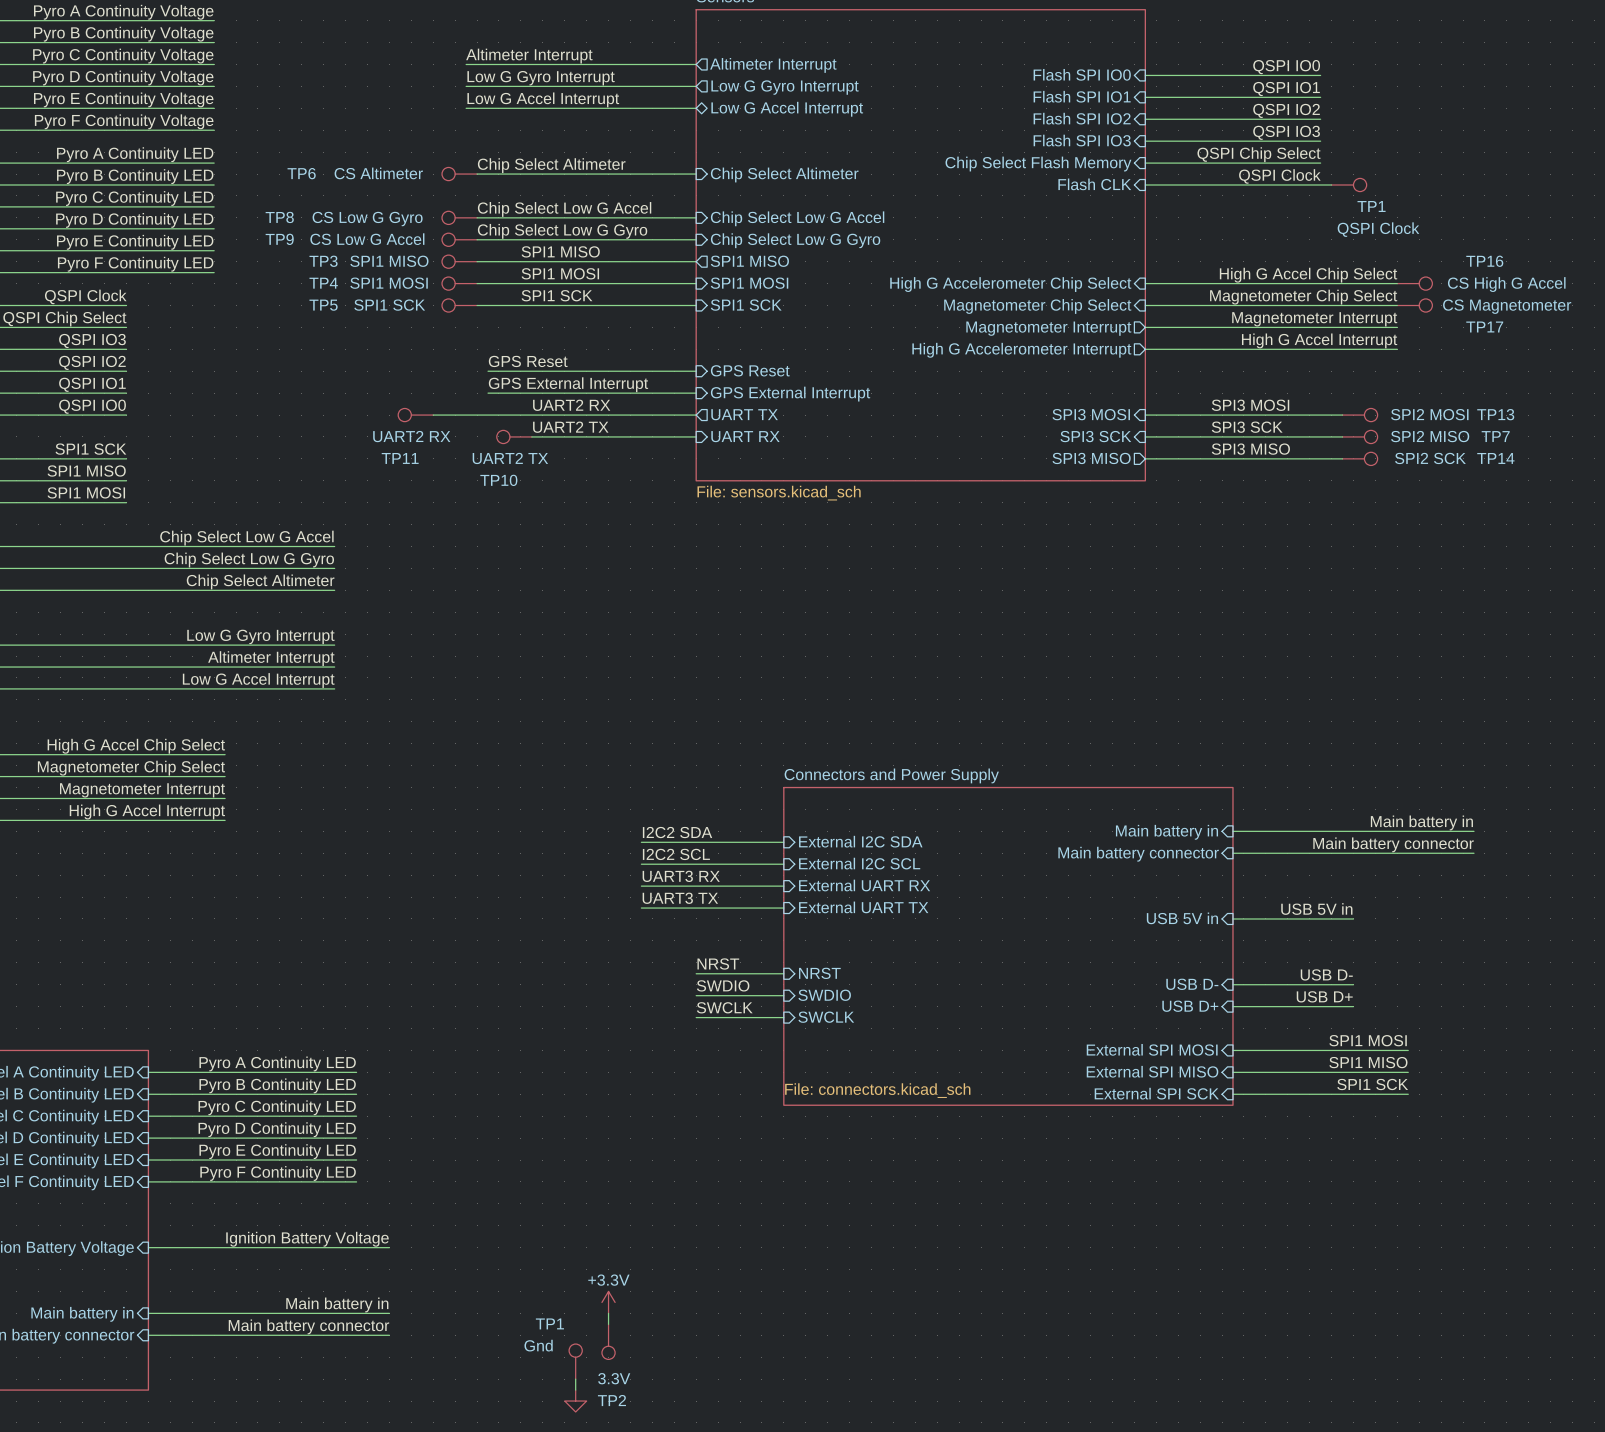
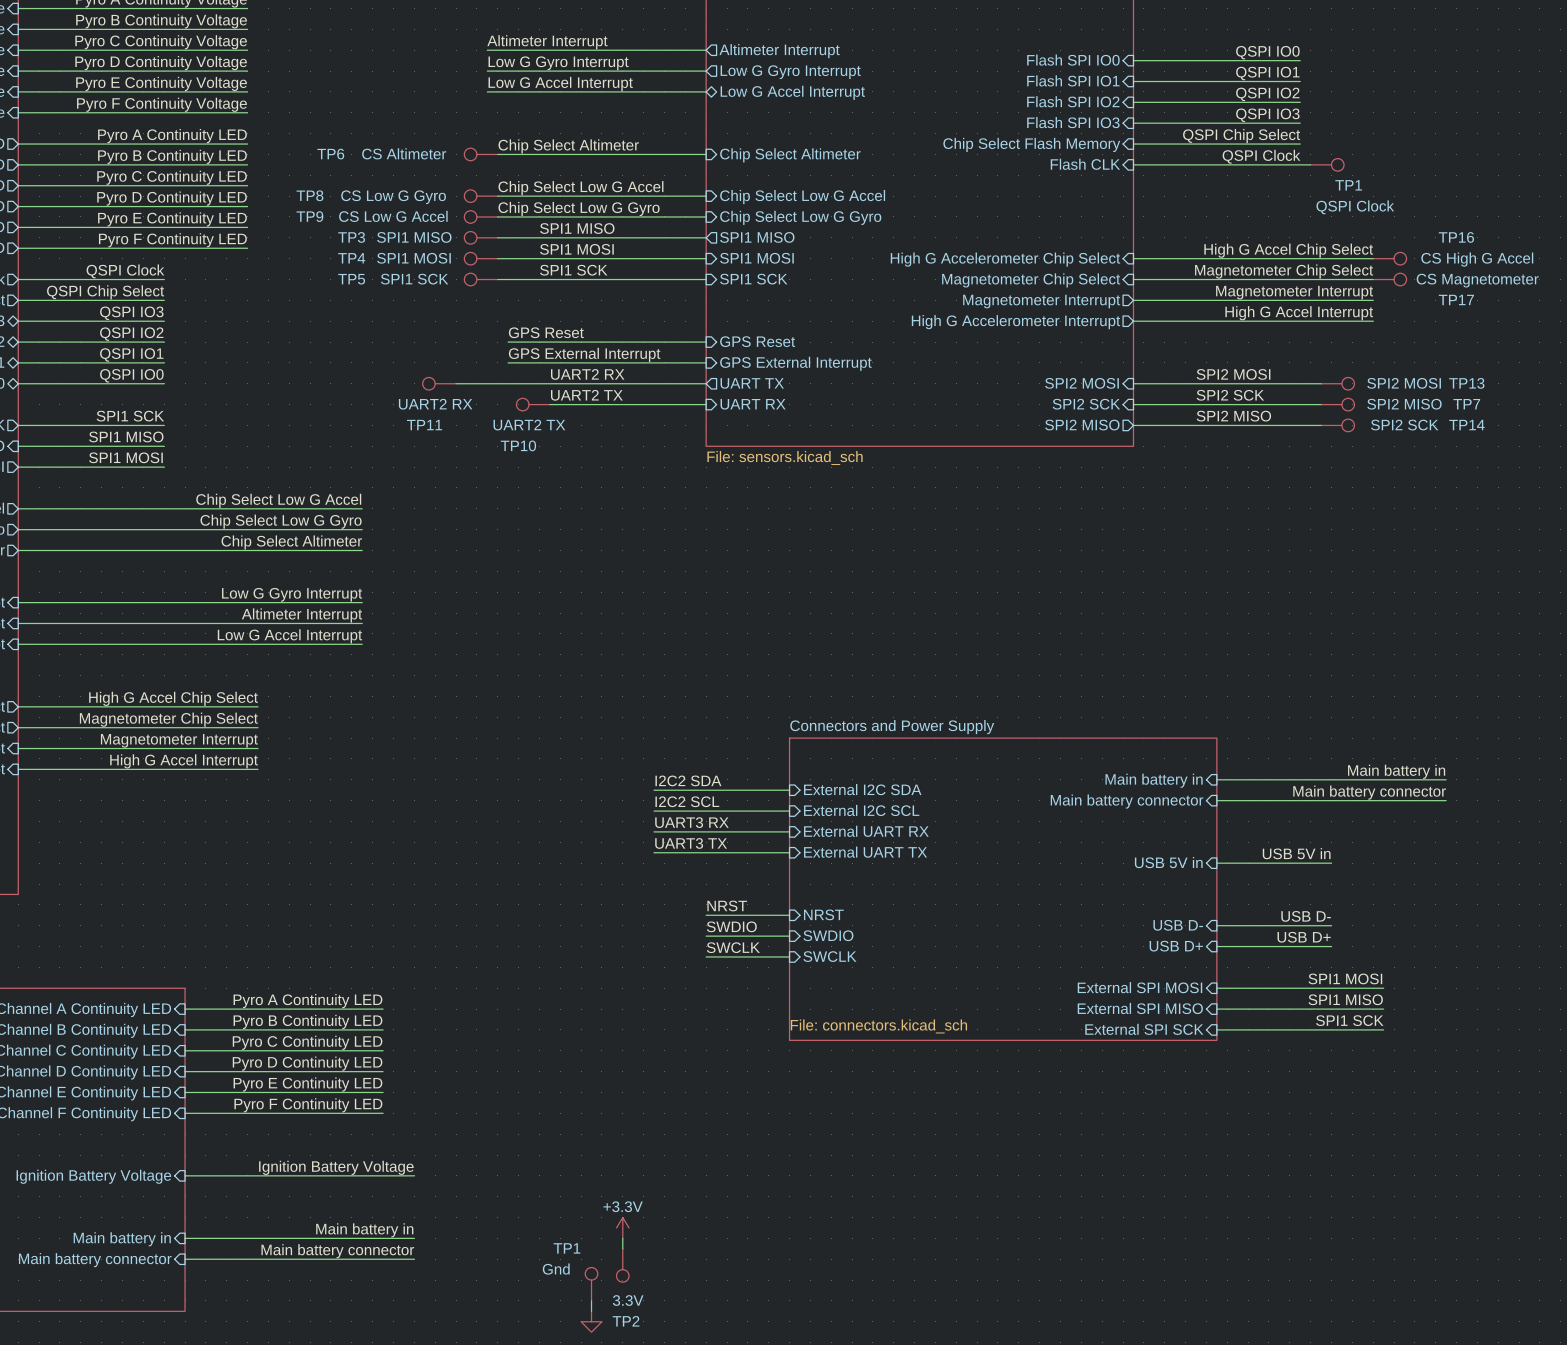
label: SPI3 MOSI (1250, 405) -> SPI2 MOSI (1233, 374)
sheet pin: SPI3 MOSI (1091, 414) -> SPI2 MOSI (1082, 383)
label: SPI3 SCK (1247, 427) -> SPI2 SCK (1230, 395)
sheet pin: SPI3 SCK (1095, 436) -> SPI2 SCK (1086, 404)
label: SPI3 MISO (1250, 449) -> SPI2 MISO (1233, 416)
sheet pin: SPI3 MISO (1091, 458) -> SPI2 MISO (1082, 425)

